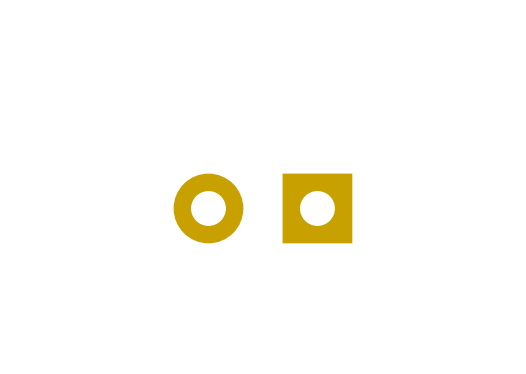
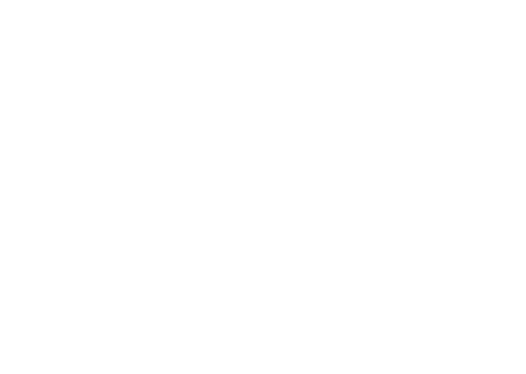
part: (262, 208) -> none

